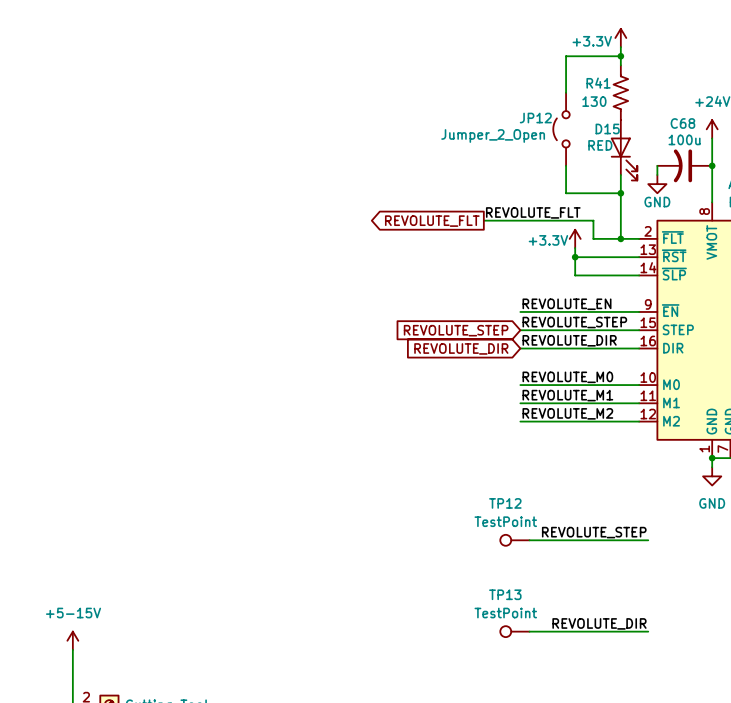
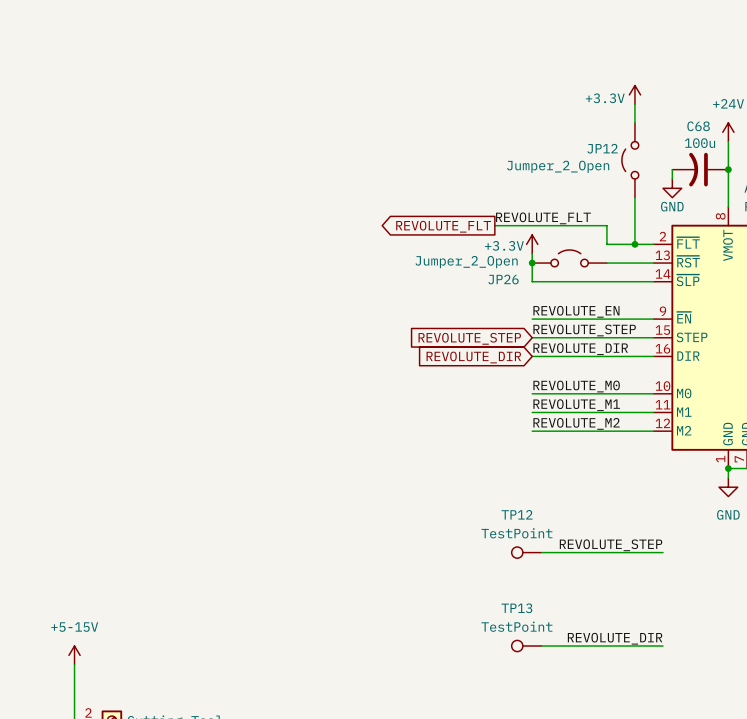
power symbol position: +3.3V (620, 38) -> +3.3V (634, 94)
wire: (620, 56) (566, 56) (566, 92) -> none
junction: (620, 56) -> none
R41: 130 (620, 92) -> none
JP12 position: (561, 129) -> (630, 160)
D15: RED (624, 150) -> none
wire: (566, 165) (566, 193) (620, 193) (620, 174) -> none
junction: (620, 193) -> none
power symbol position: +3.3V (575, 238) -> +3.3V (532, 244)
wire: (575, 248) (575, 275) -> (532, 253) (532, 281) (588, 281)
JP26: none -> Jumper_2_Open (569, 258)
junction: none -> (532, 263)
junction: (575, 257) -> none

